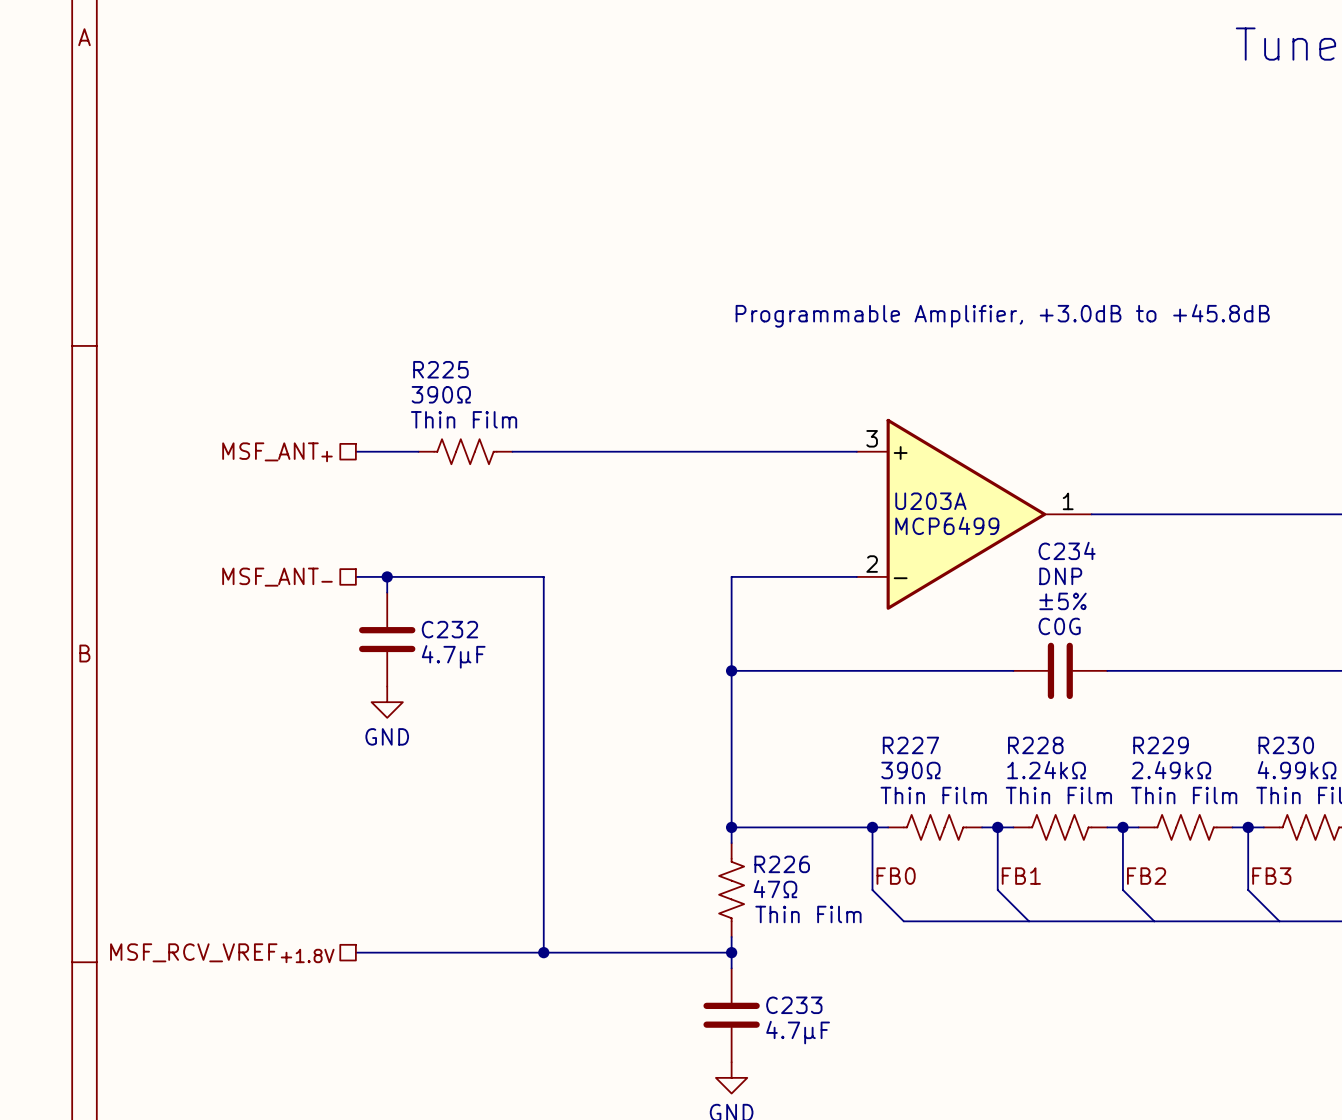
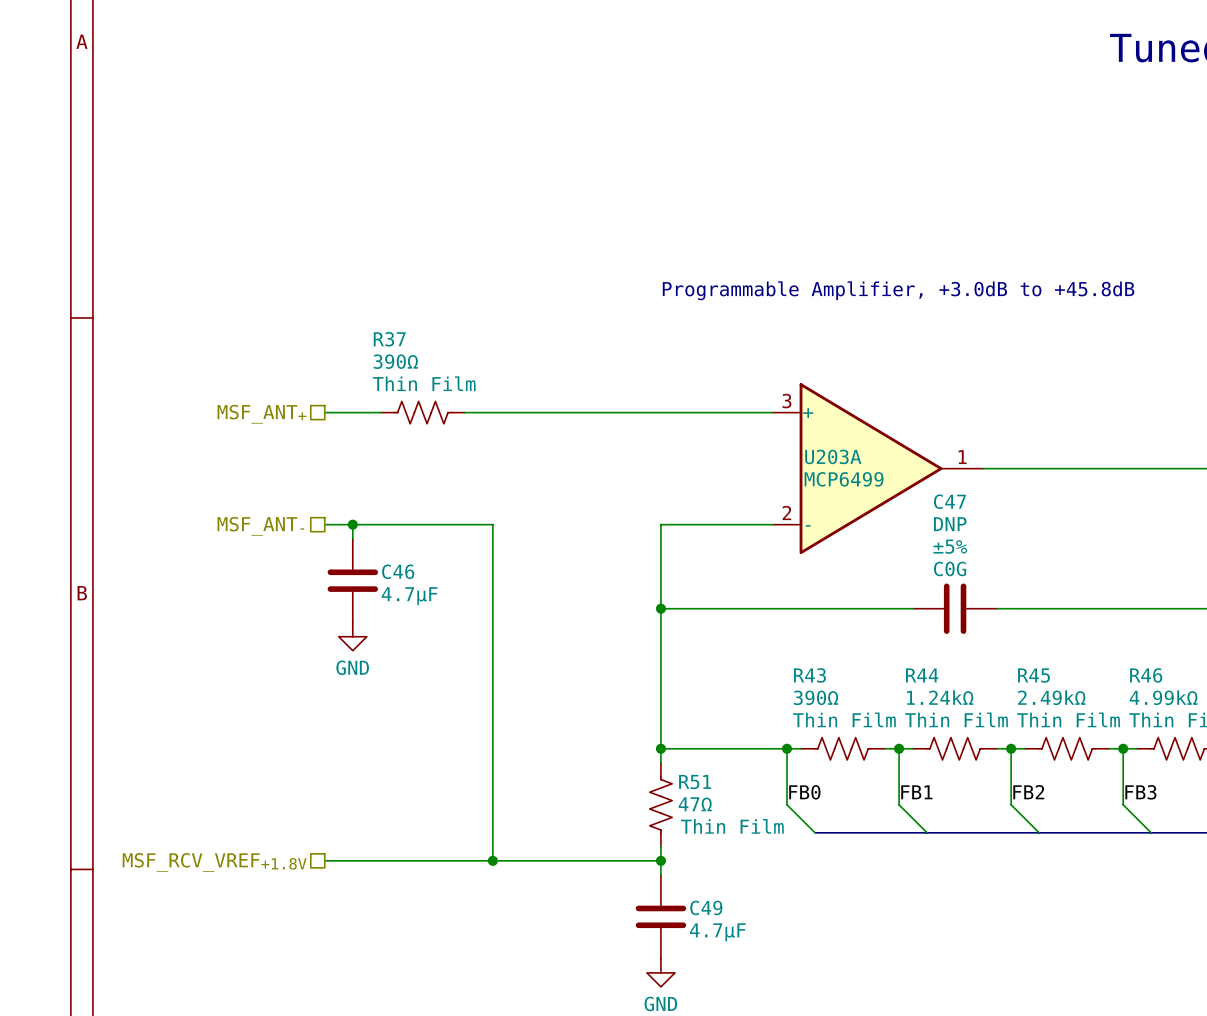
R225 name: R225 (440, 369) -> R37 (389, 339)
C234 name: C234 (1067, 550) -> C47 (949, 501)
C232 name: C232 (449, 629) -> C46 (398, 571)
R227 name: R227 (910, 745) -> R43 (809, 675)
R228 name: R228 (1035, 745) -> R44 (922, 675)
R229 name: R229 (1161, 745) -> R45 (1033, 675)
R230 name: R230 (1286, 745) -> R46 (1146, 675)
R226 name: R226 (782, 864) -> R51 (695, 782)
C233 name: C233 (794, 1005) -> C49 (706, 907)

